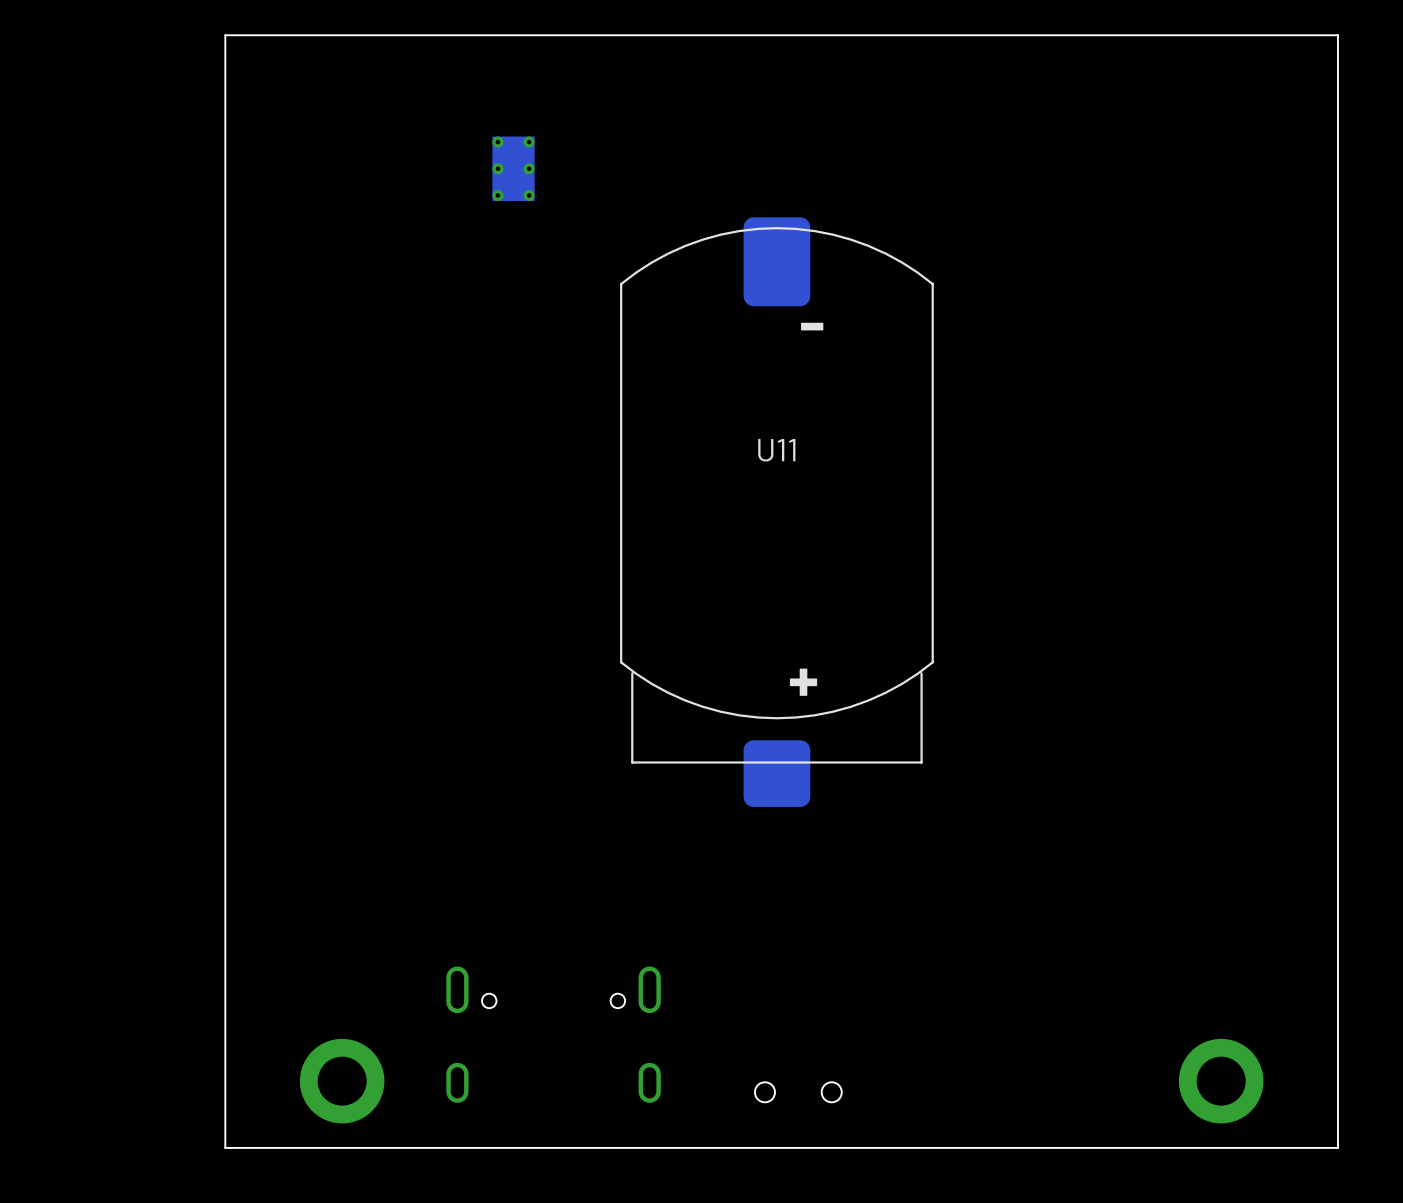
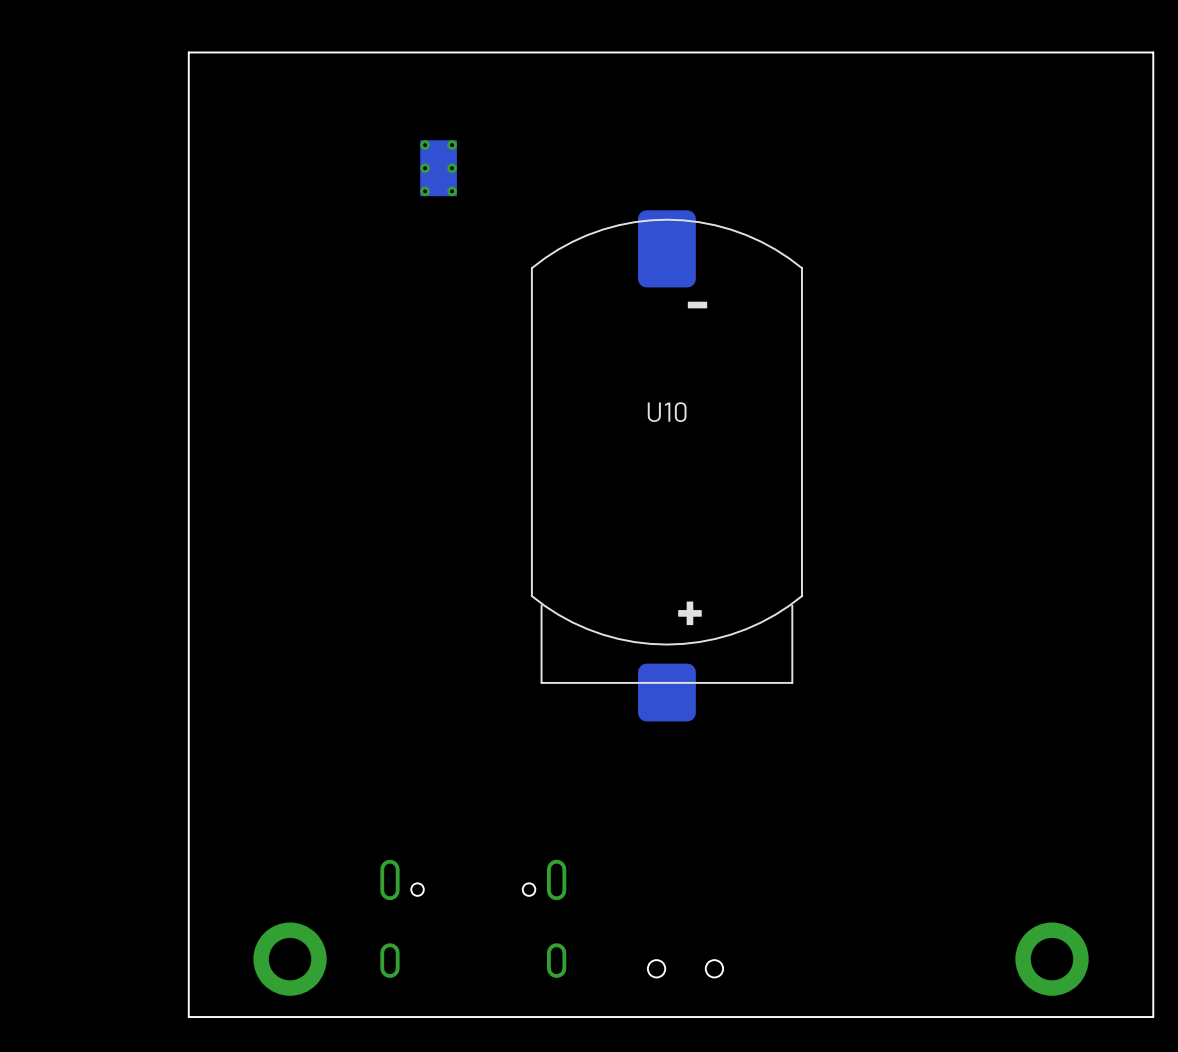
U11 name: U11 (776, 450) -> U10 (667, 412)

